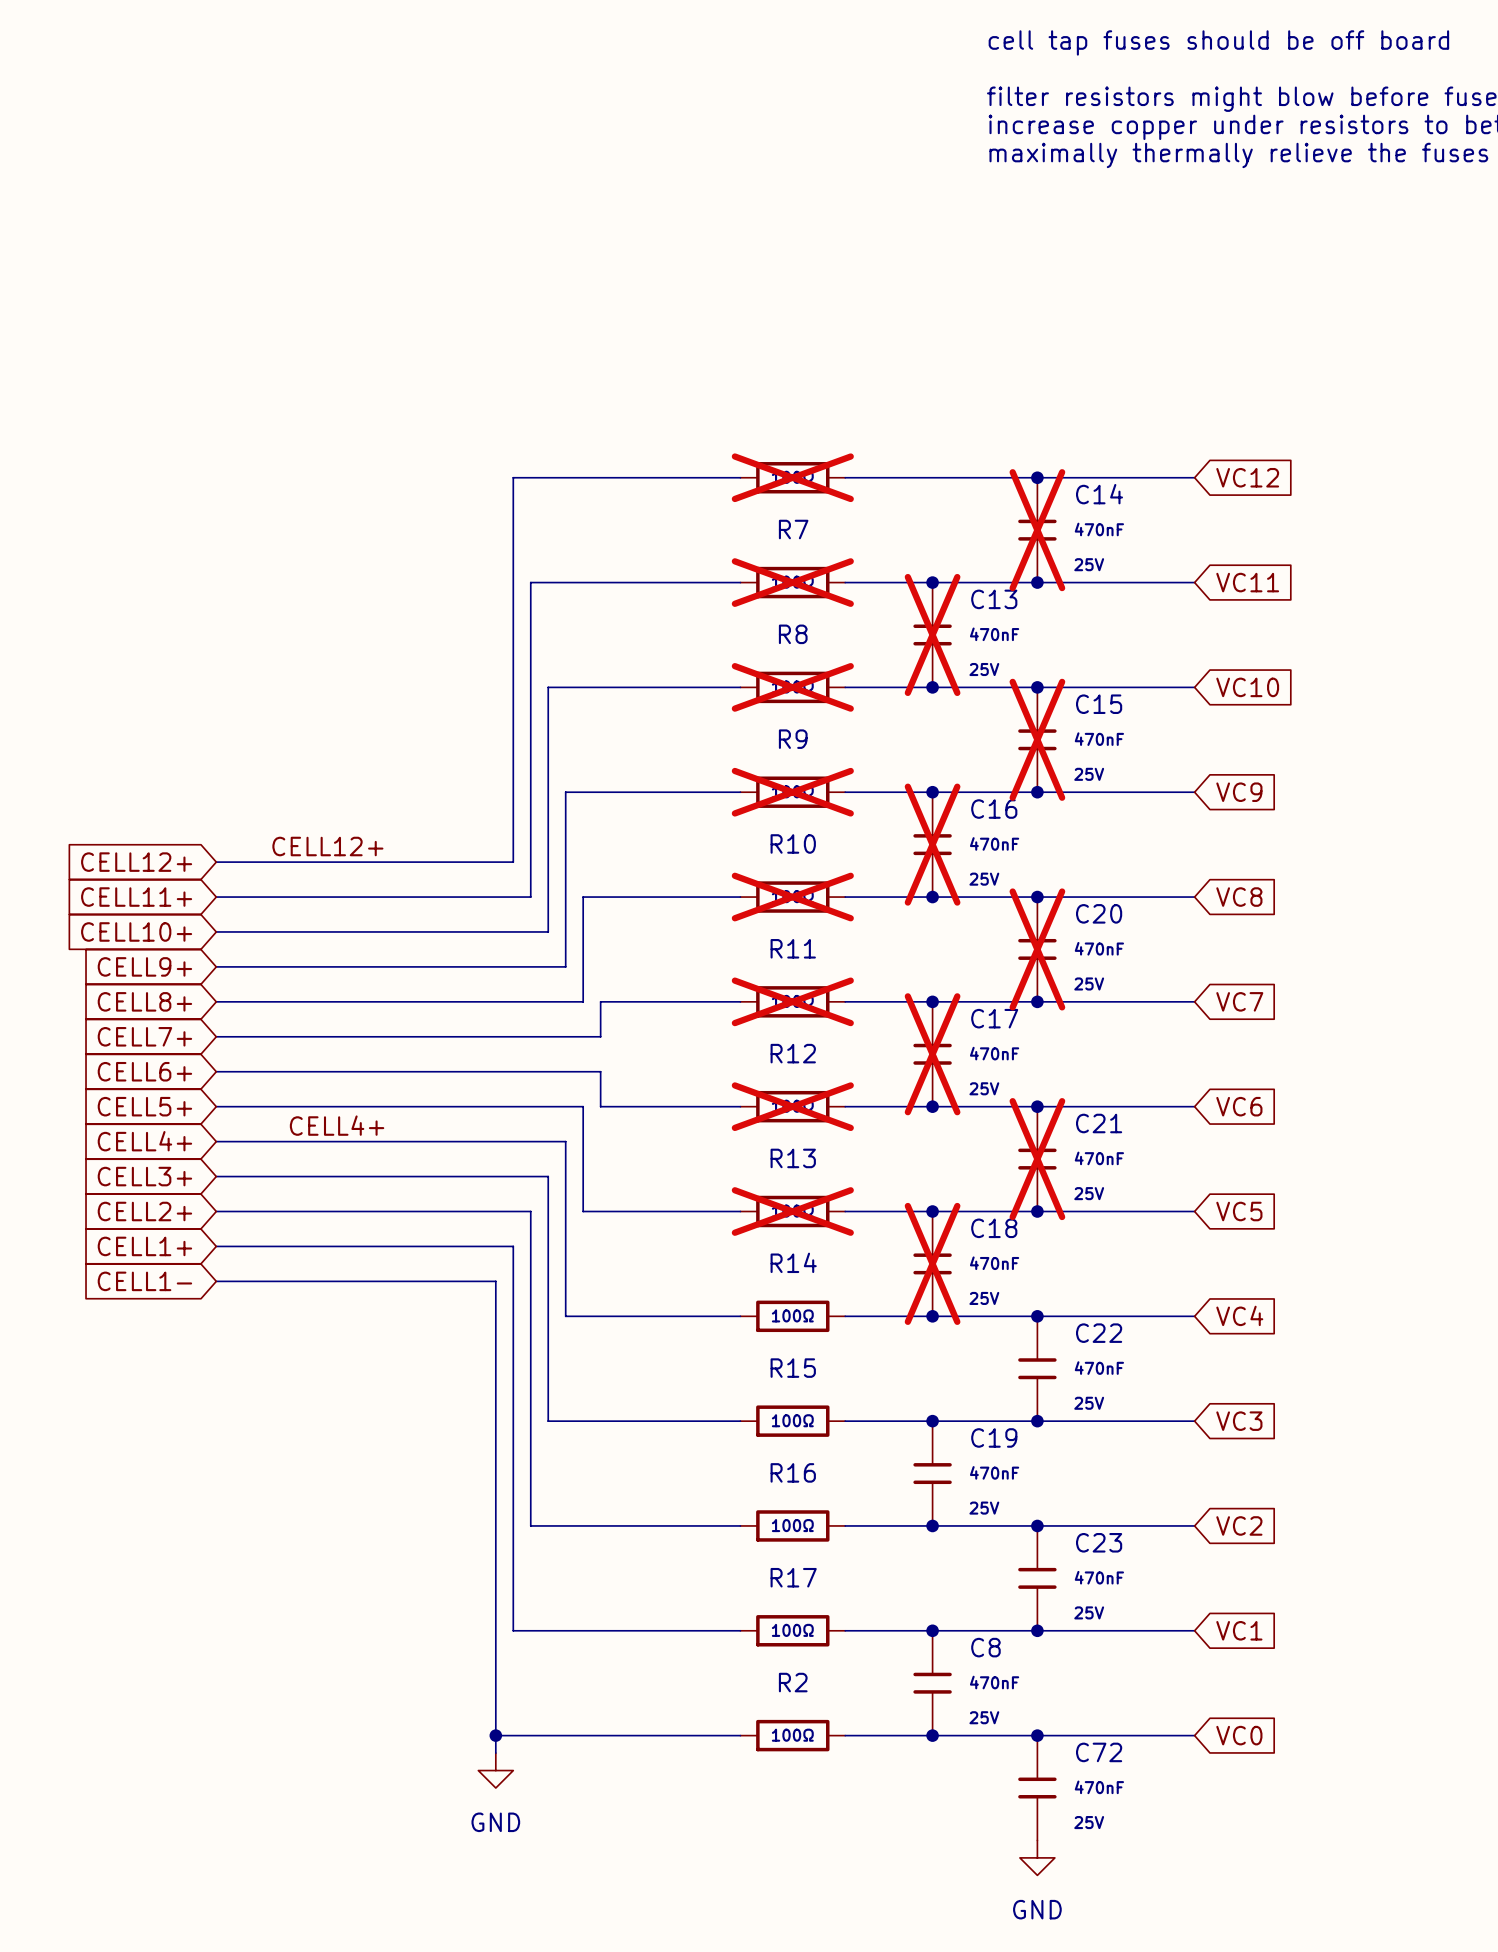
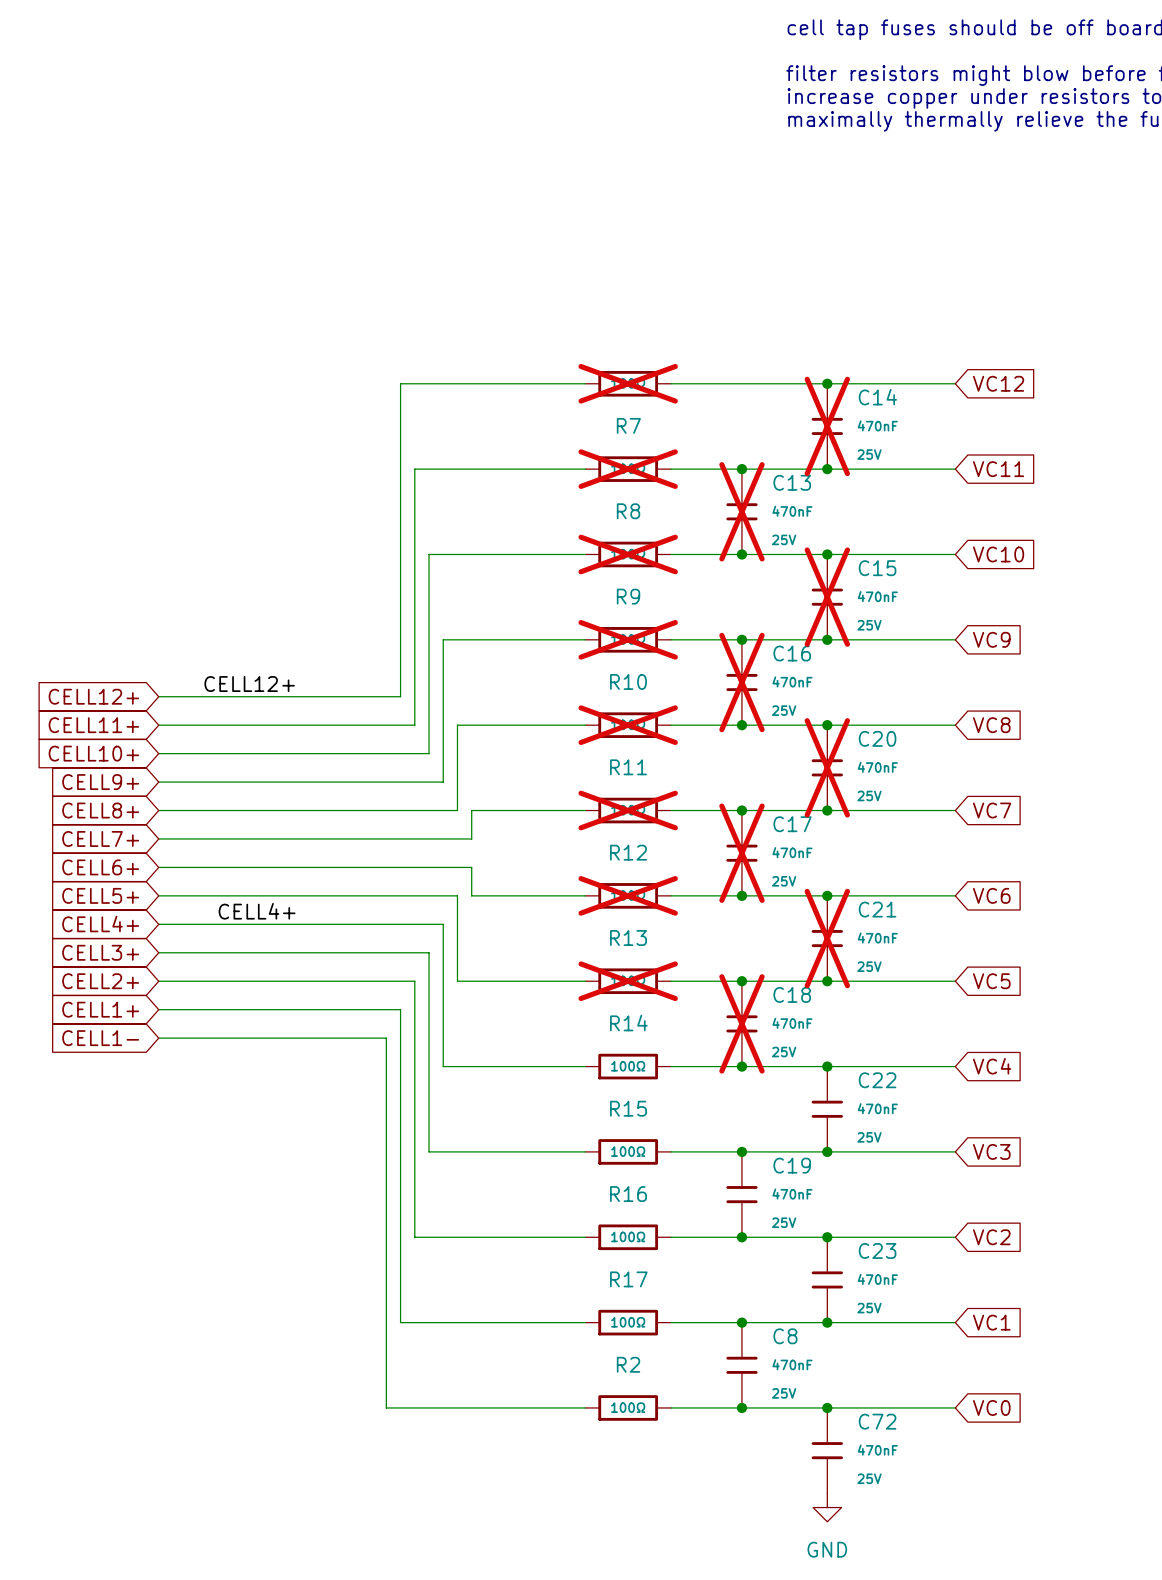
wire: (495, 1735) (495, 1753) -> none
junction: (495, 1735) -> none
power symbol: GND (495, 1770) -> none

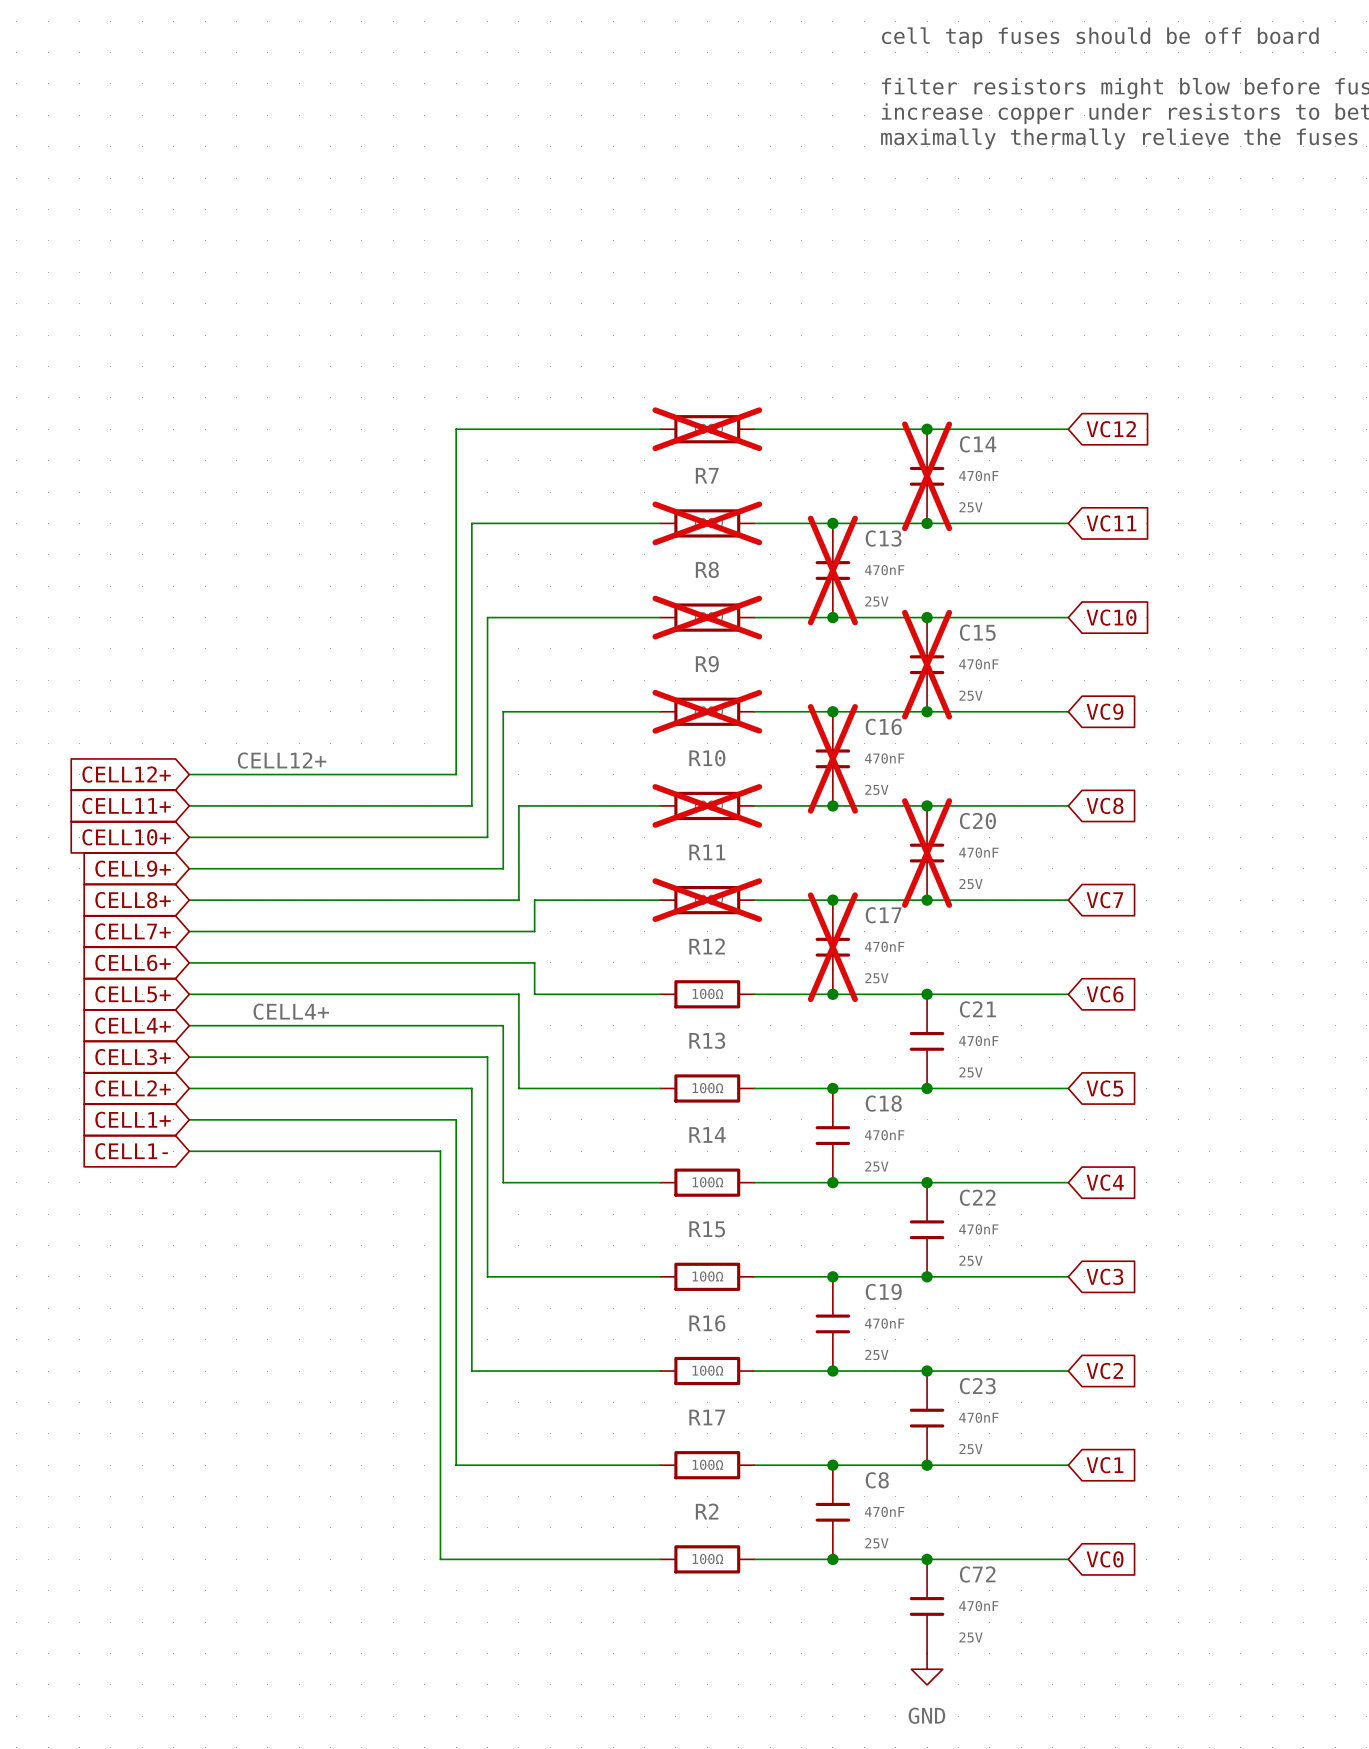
R12 do-not-place cross: (628, 895) -> none
C21 do-not-place cross: (827, 938) -> none
R13 do-not-place cross: (628, 981) -> none
C18 do-not-place cross: (741, 1023) -> none

